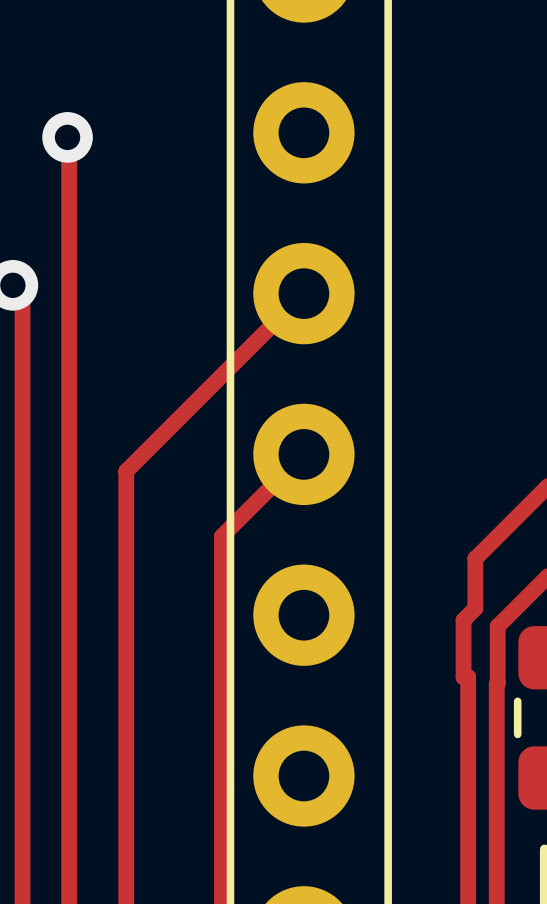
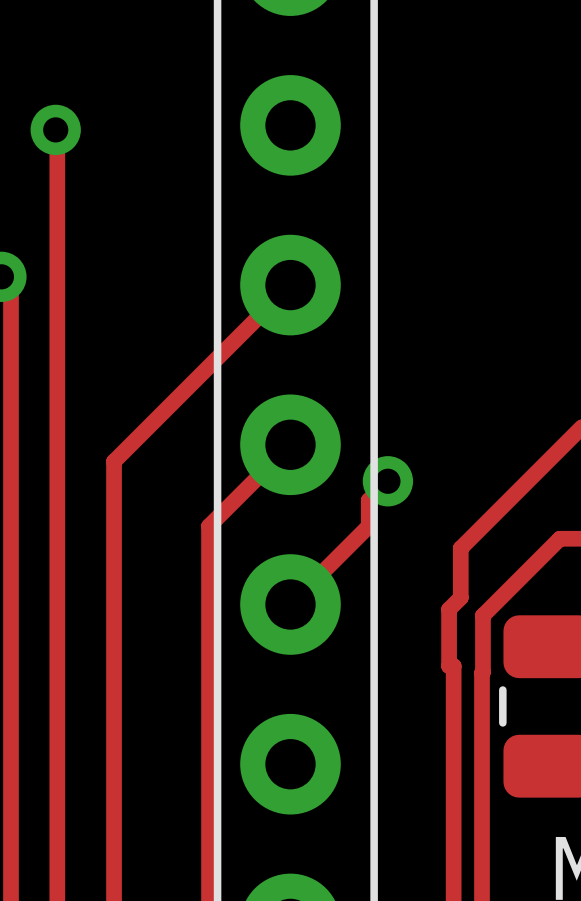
top track: none -> (387, 481) (368, 500) (368, 526) (290, 604)
via: none -> (387, 481)

